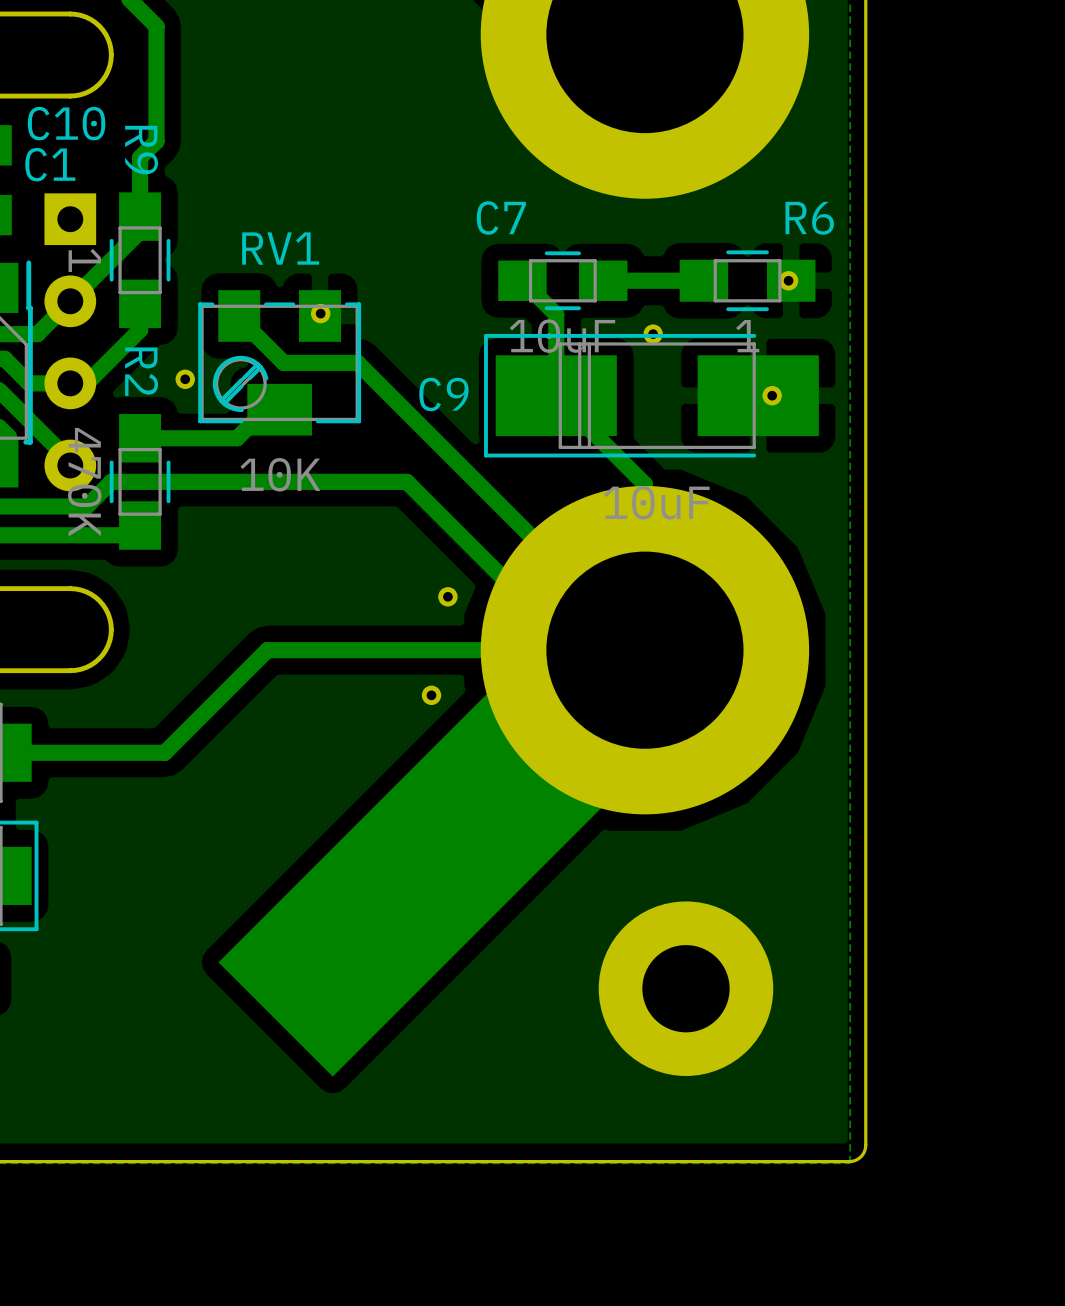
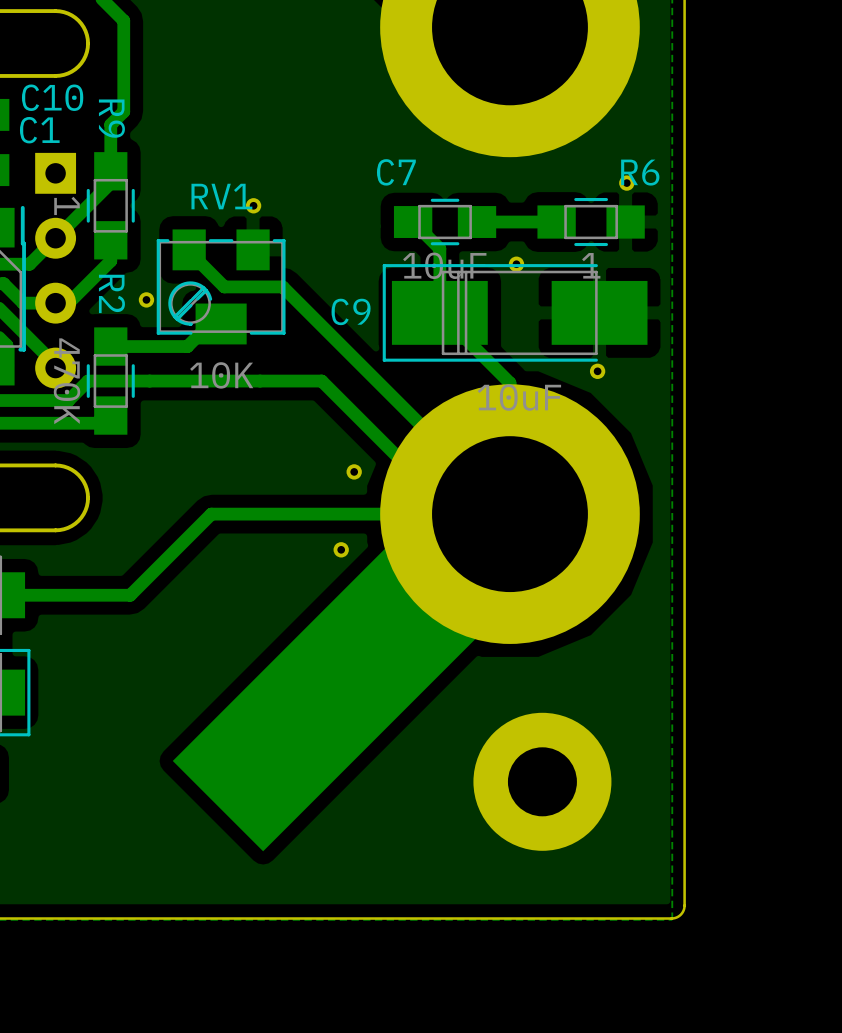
part position: (788, 280) -> (626, 183)
part position: (320, 313) -> (253, 205)
part position: (772, 395) -> (597, 371)

